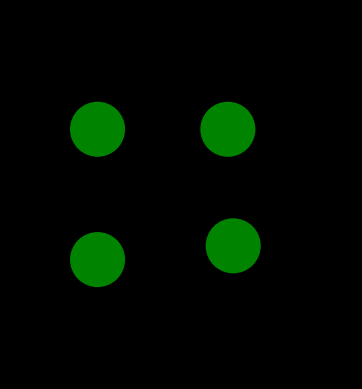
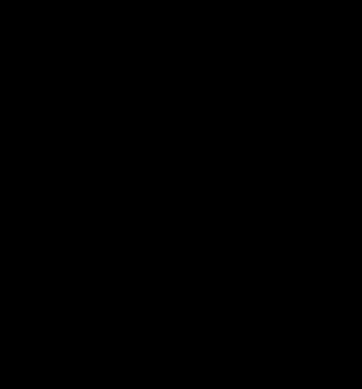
part: (97, 129) -> none
part: (227, 129) -> none
part: (233, 245) -> none
part: (97, 259) -> none

